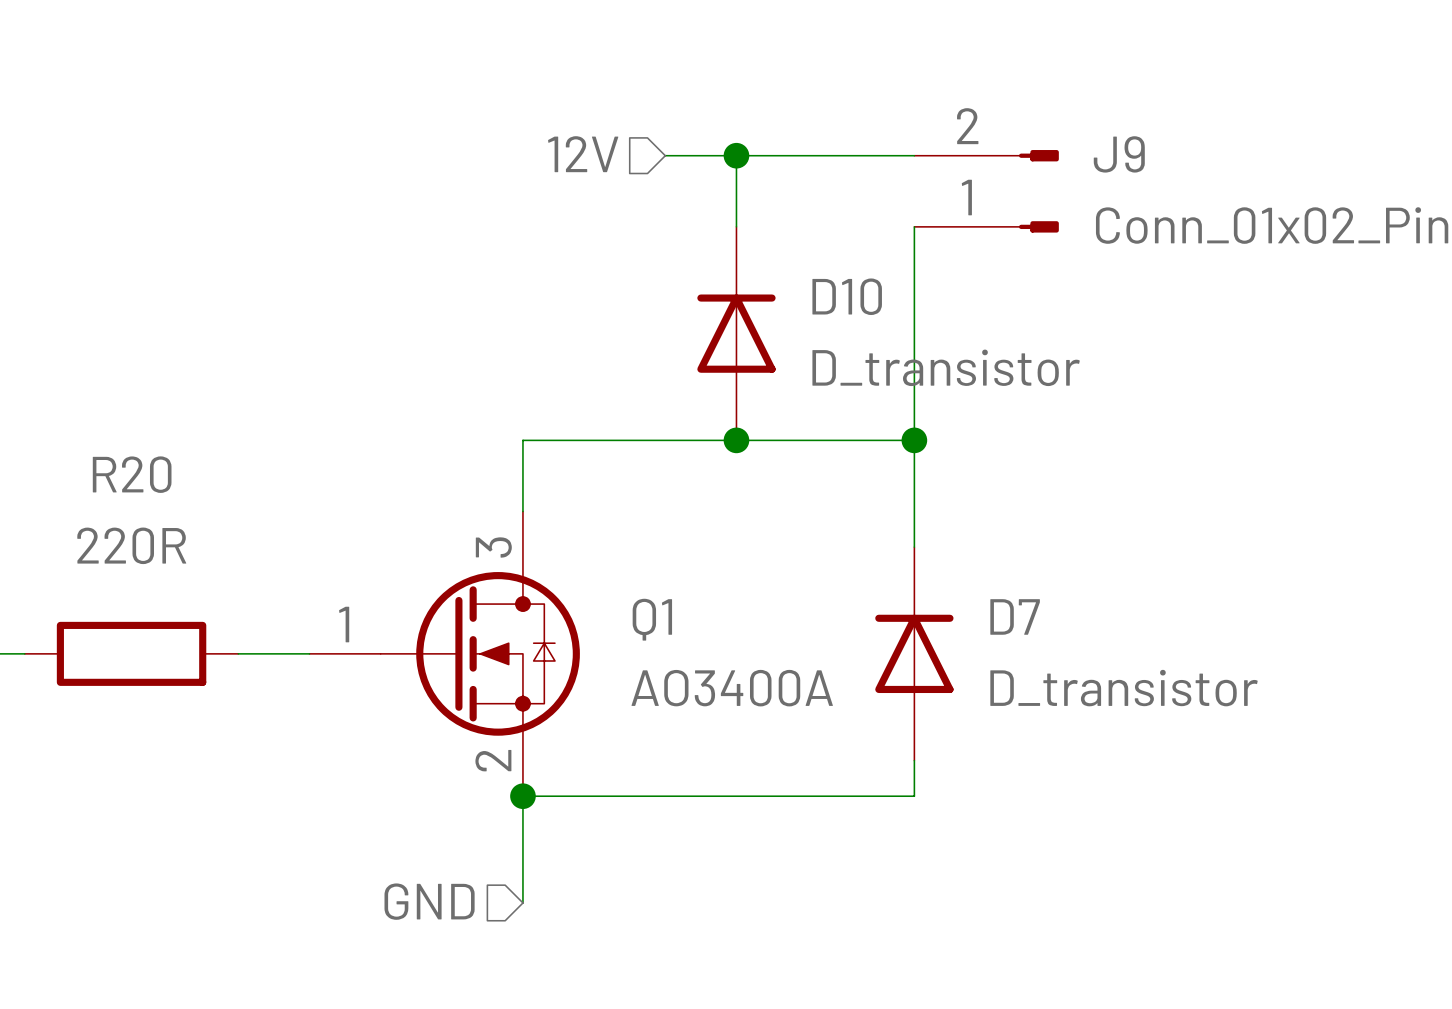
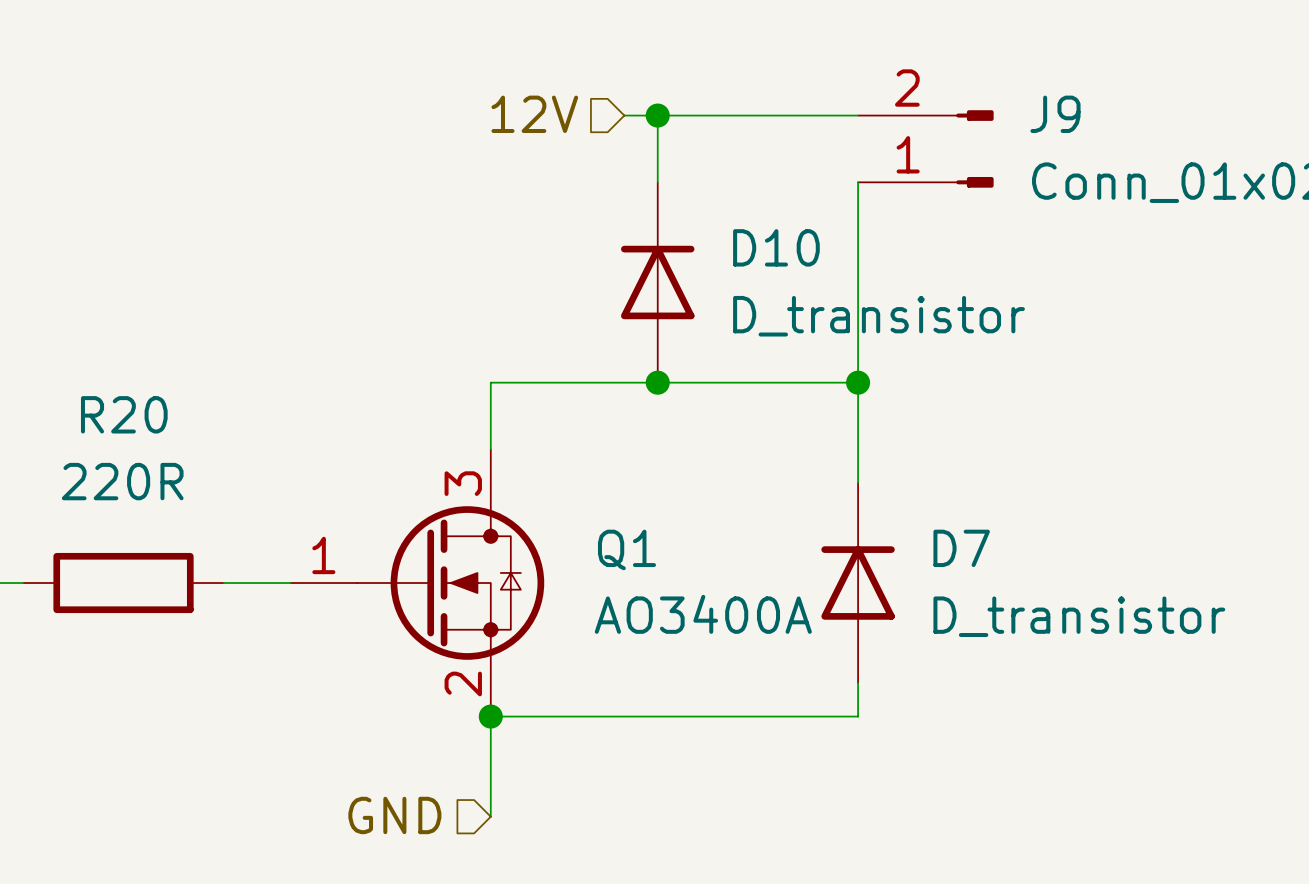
wire: (736, 155) (736, 226) -> (657, 115) (657, 182)
junction position: (736, 155) -> (657, 115)
D10 position: (736, 333) -> (657, 282)
junction position: (736, 440) -> (657, 382)

